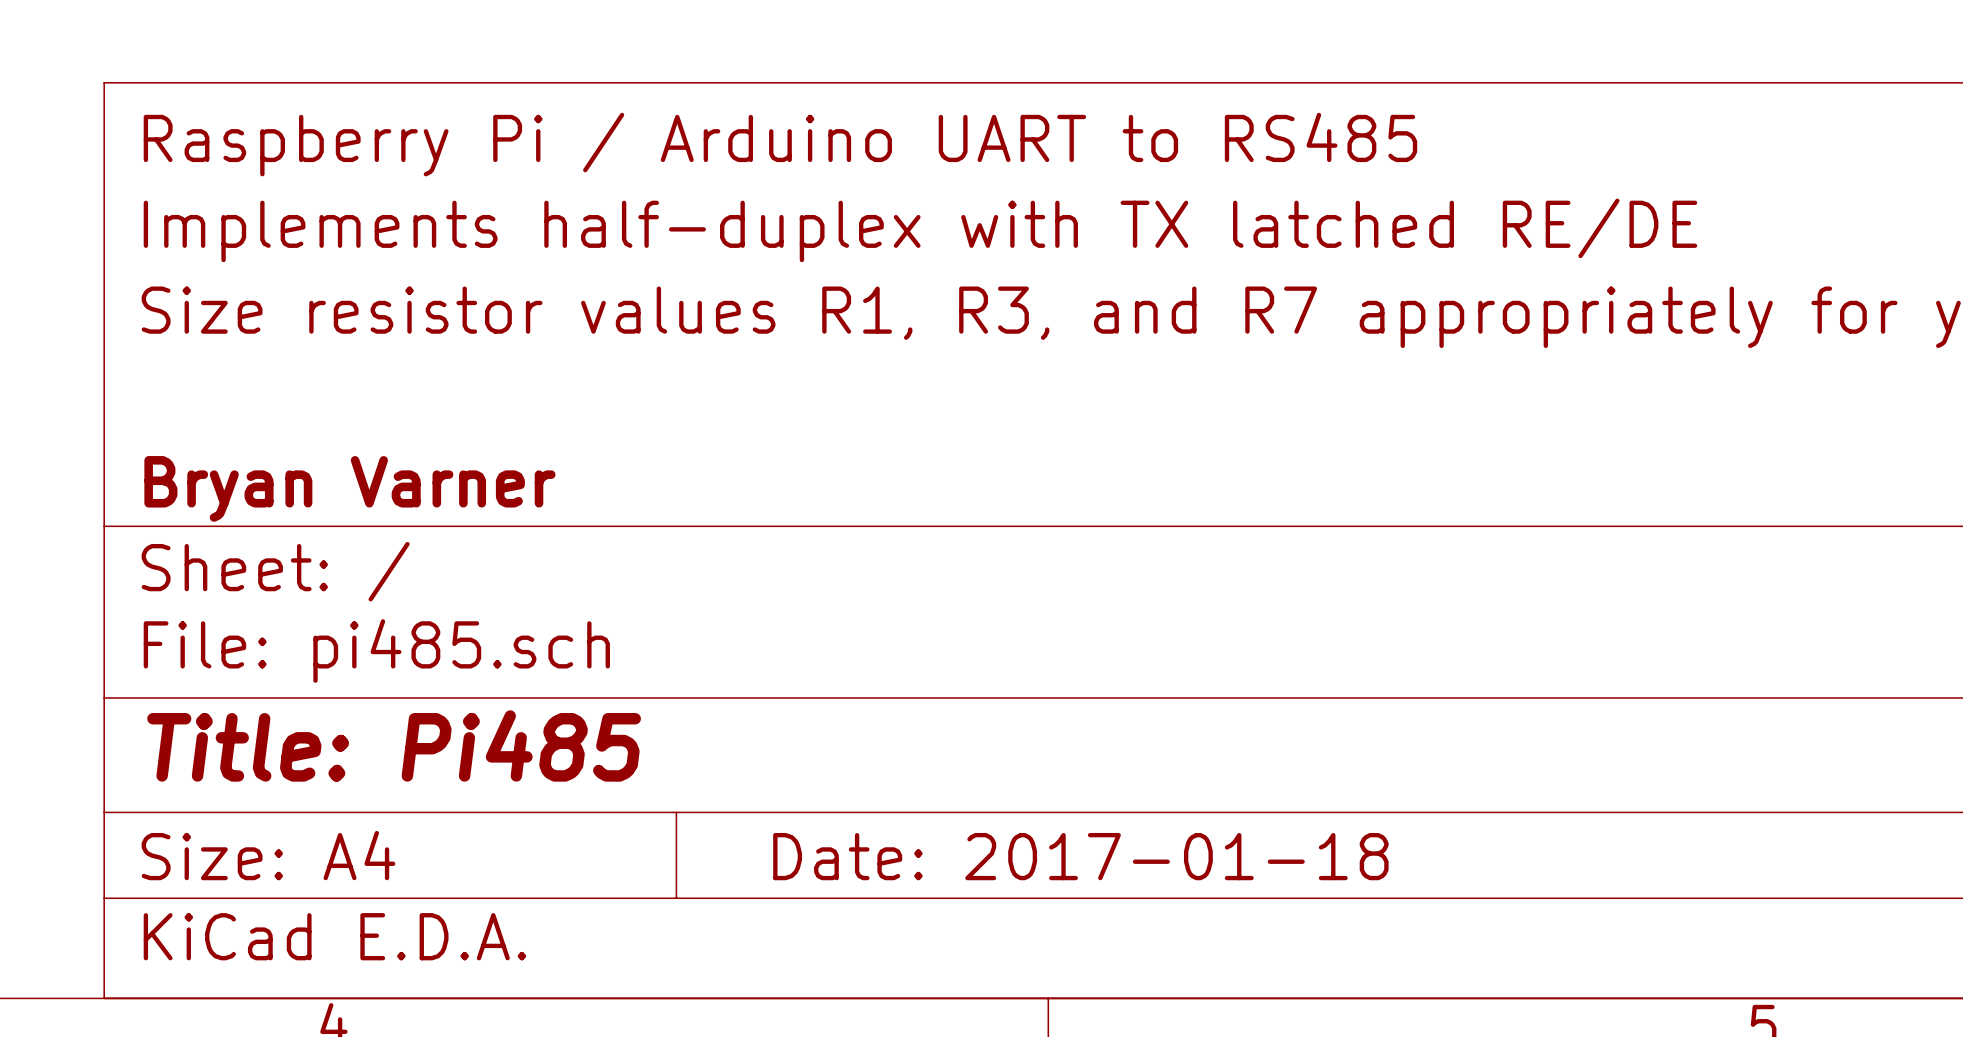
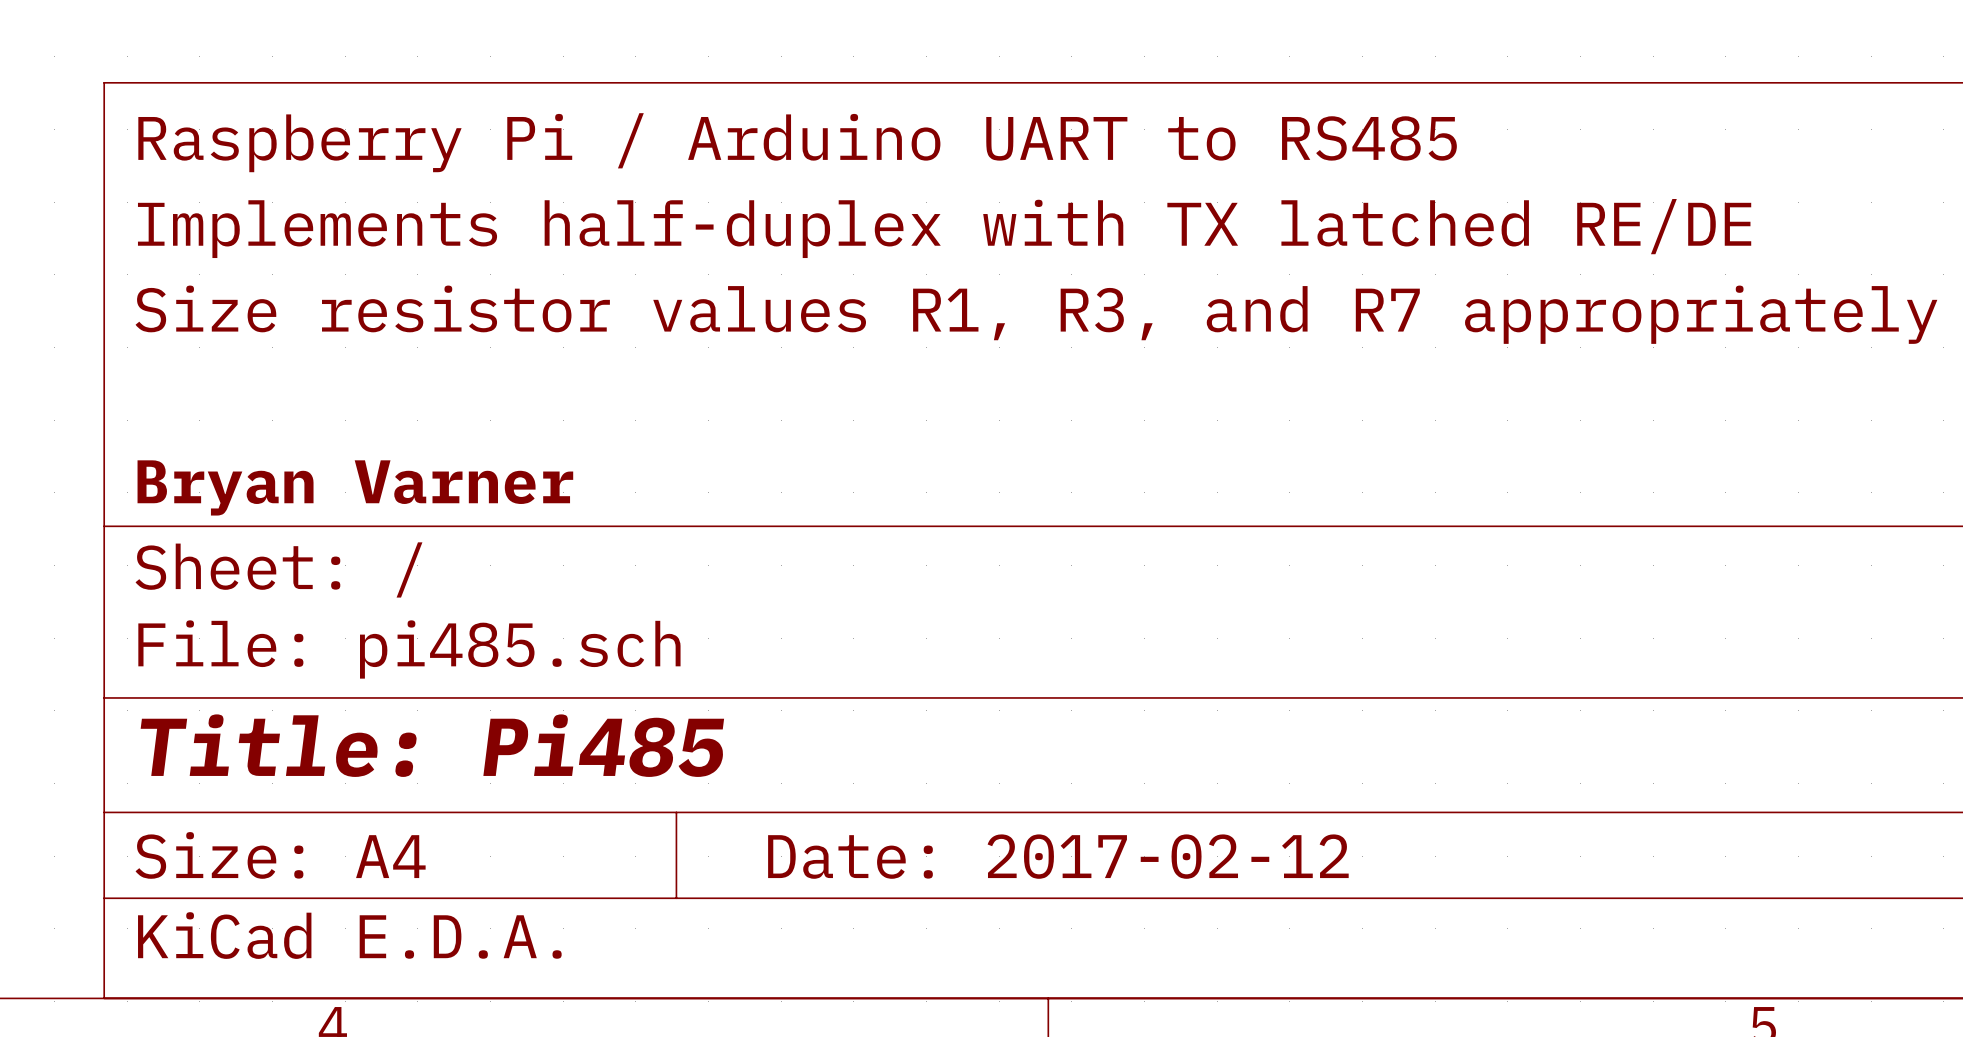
title block: Date: 2017-01-18 (1080, 856) -> Date: 2017-02-12 (1058, 856)

